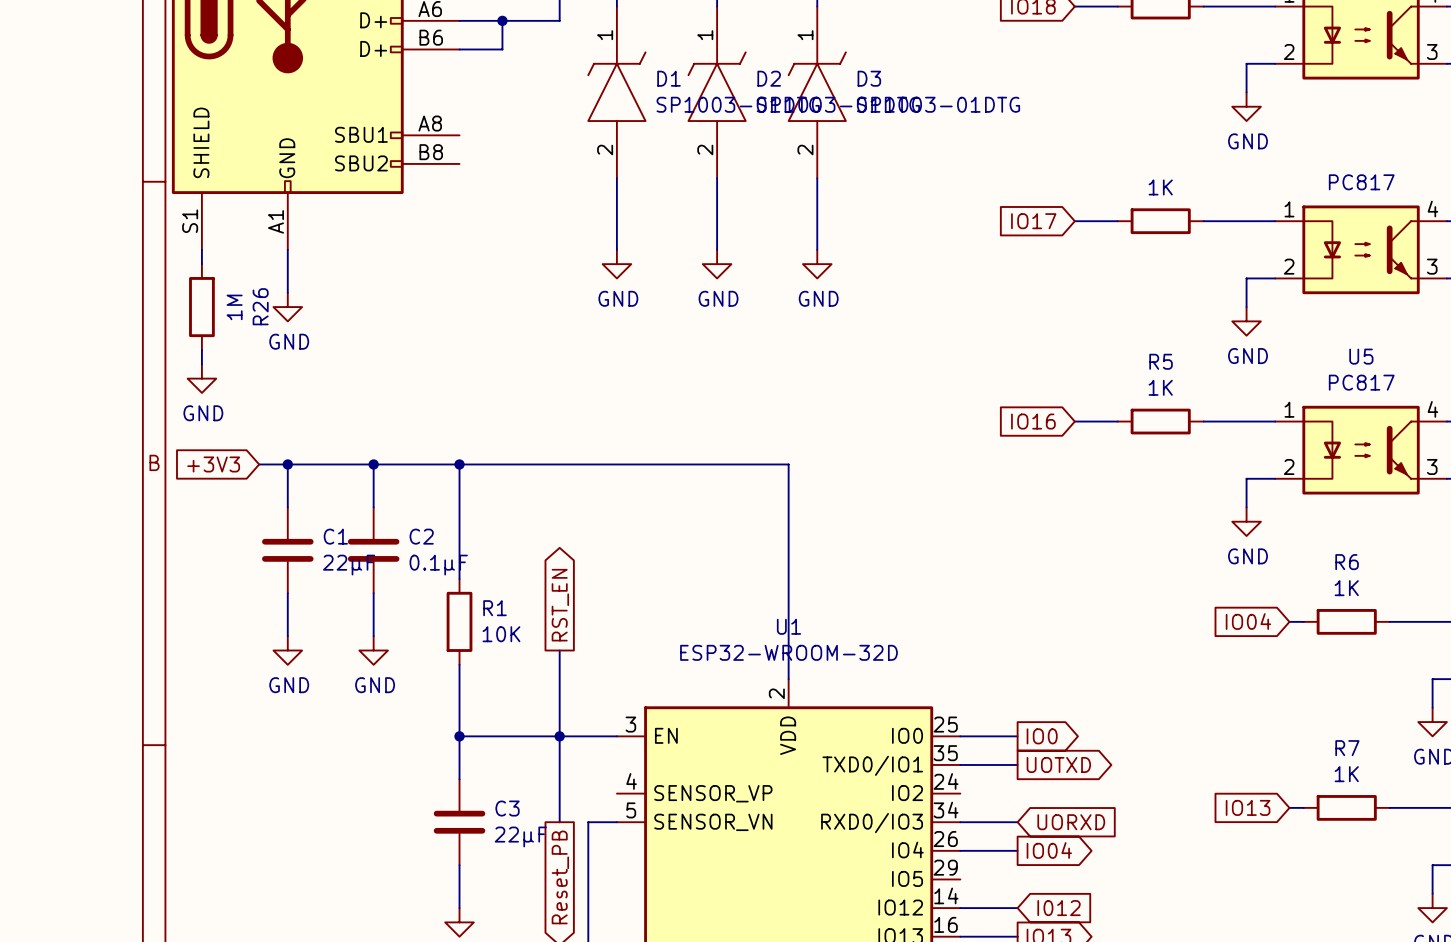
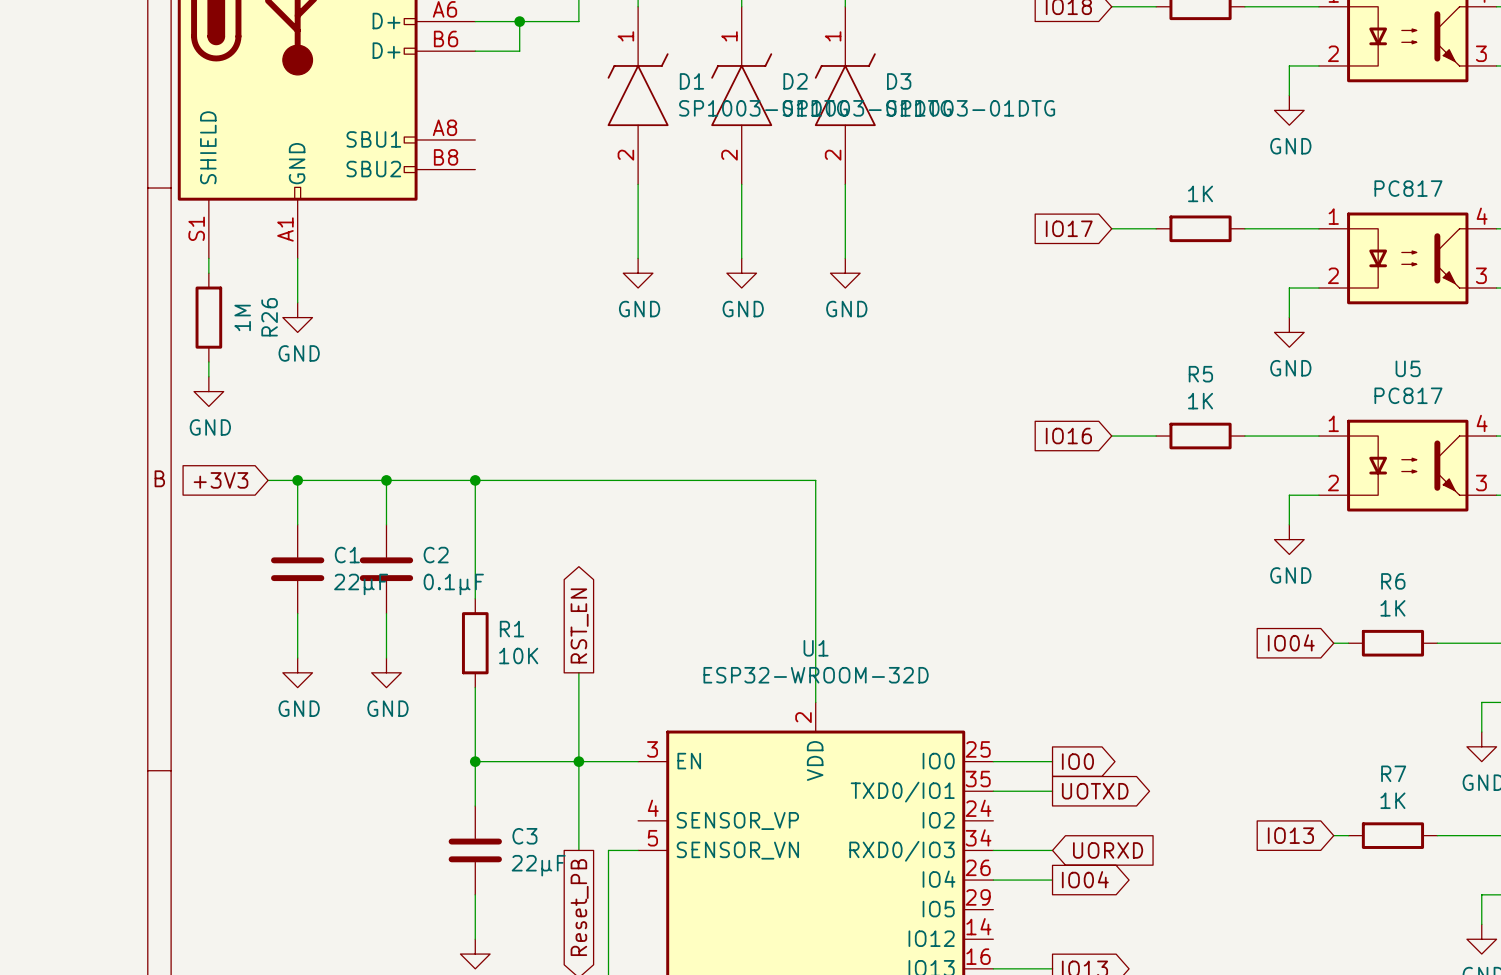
wire: (960, 908) (1017, 908) -> none
global label: I012 (1059, 908) -> none

